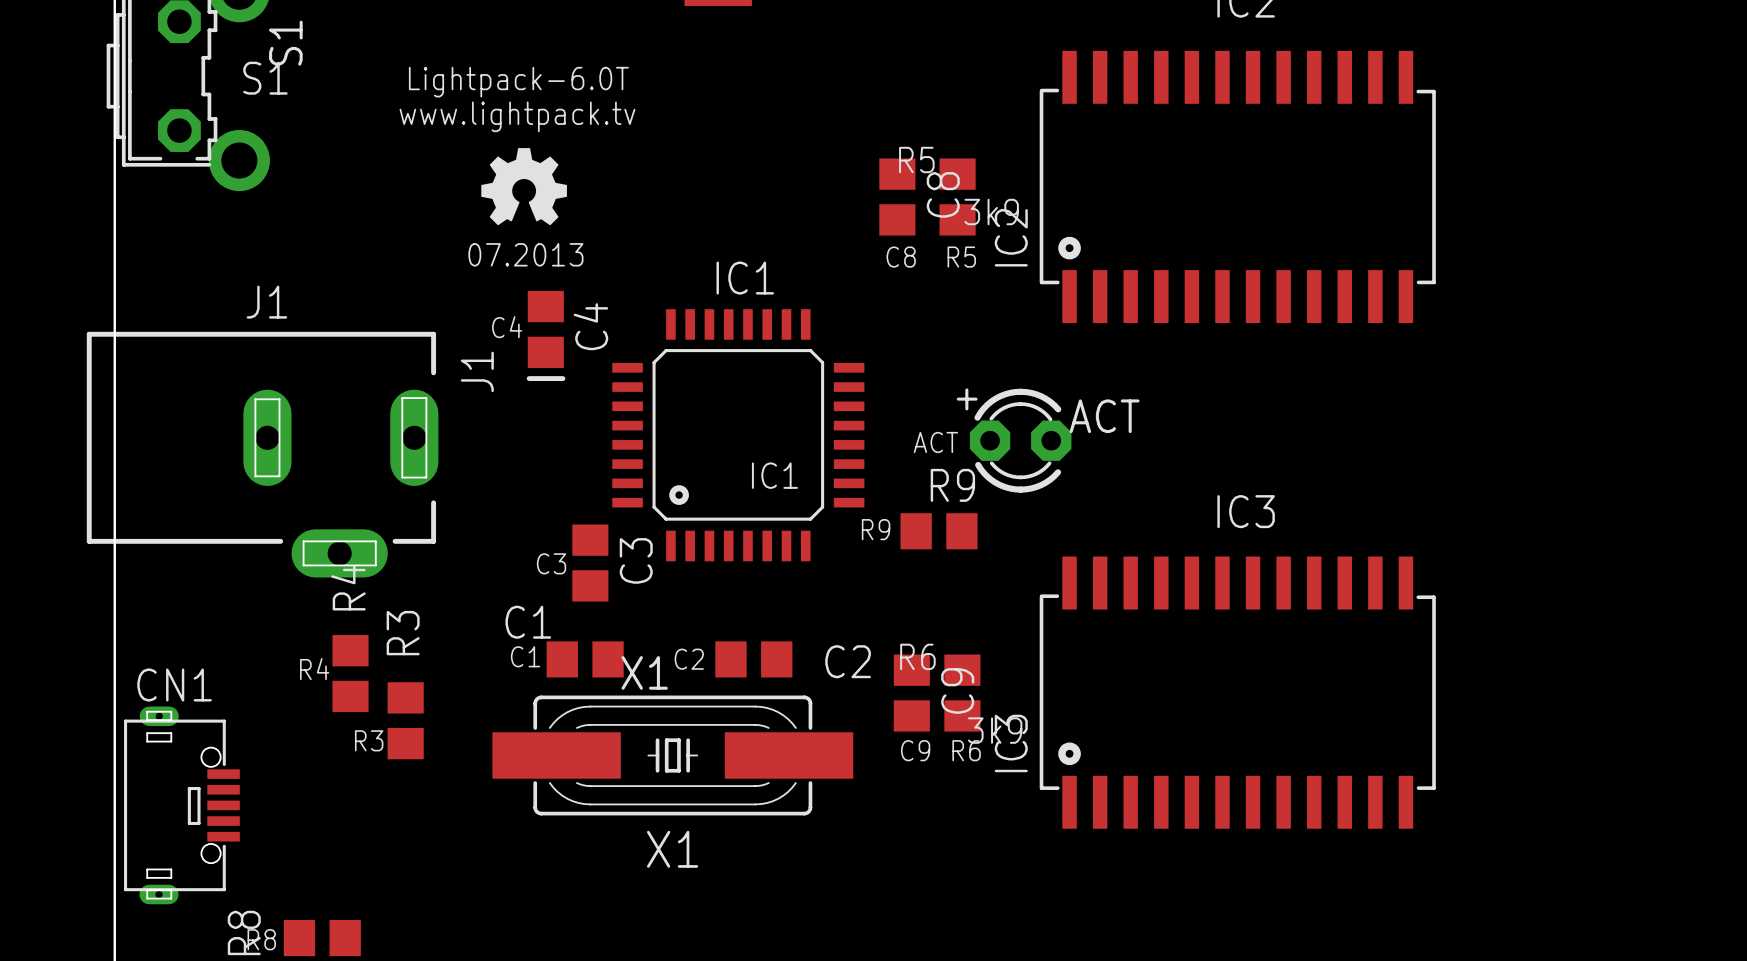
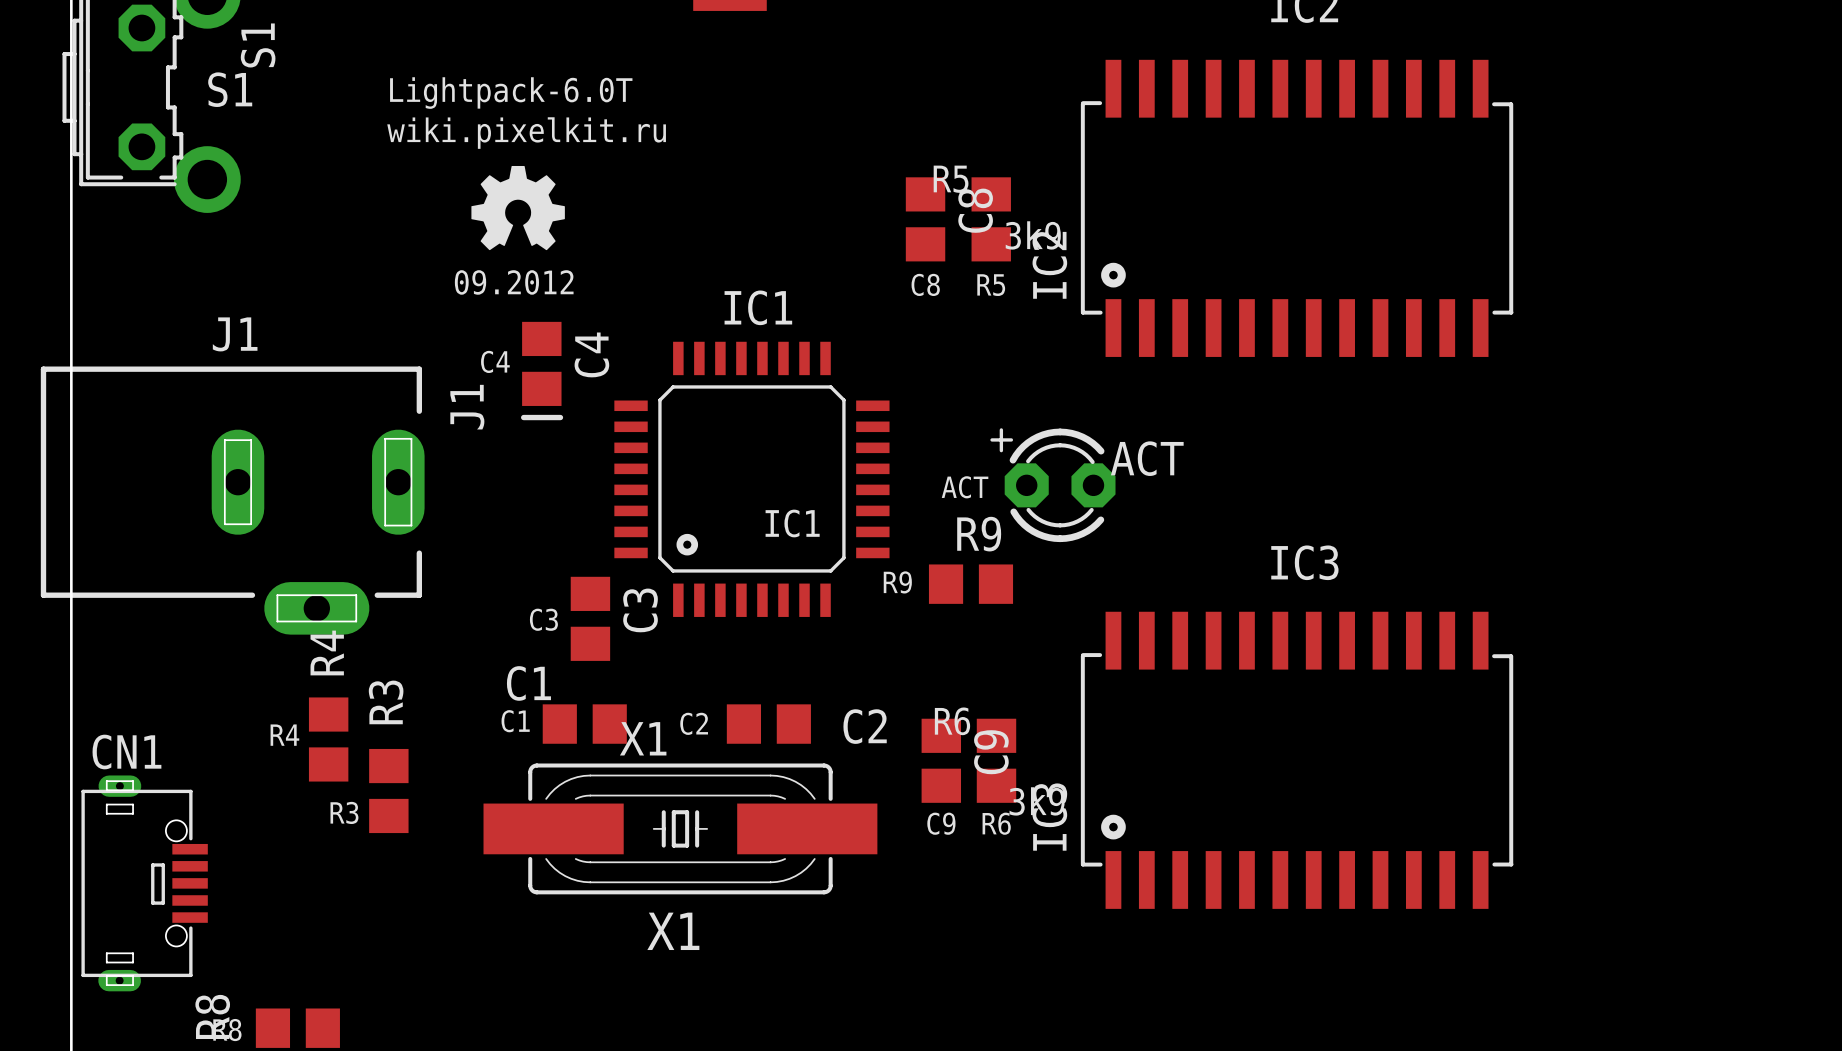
text: www.lightpack.tv (517, 116) -> wiki.pixelkit.ru (526, 133)
text: 07.2013 (525, 254) -> 09.2012 (514, 282)

